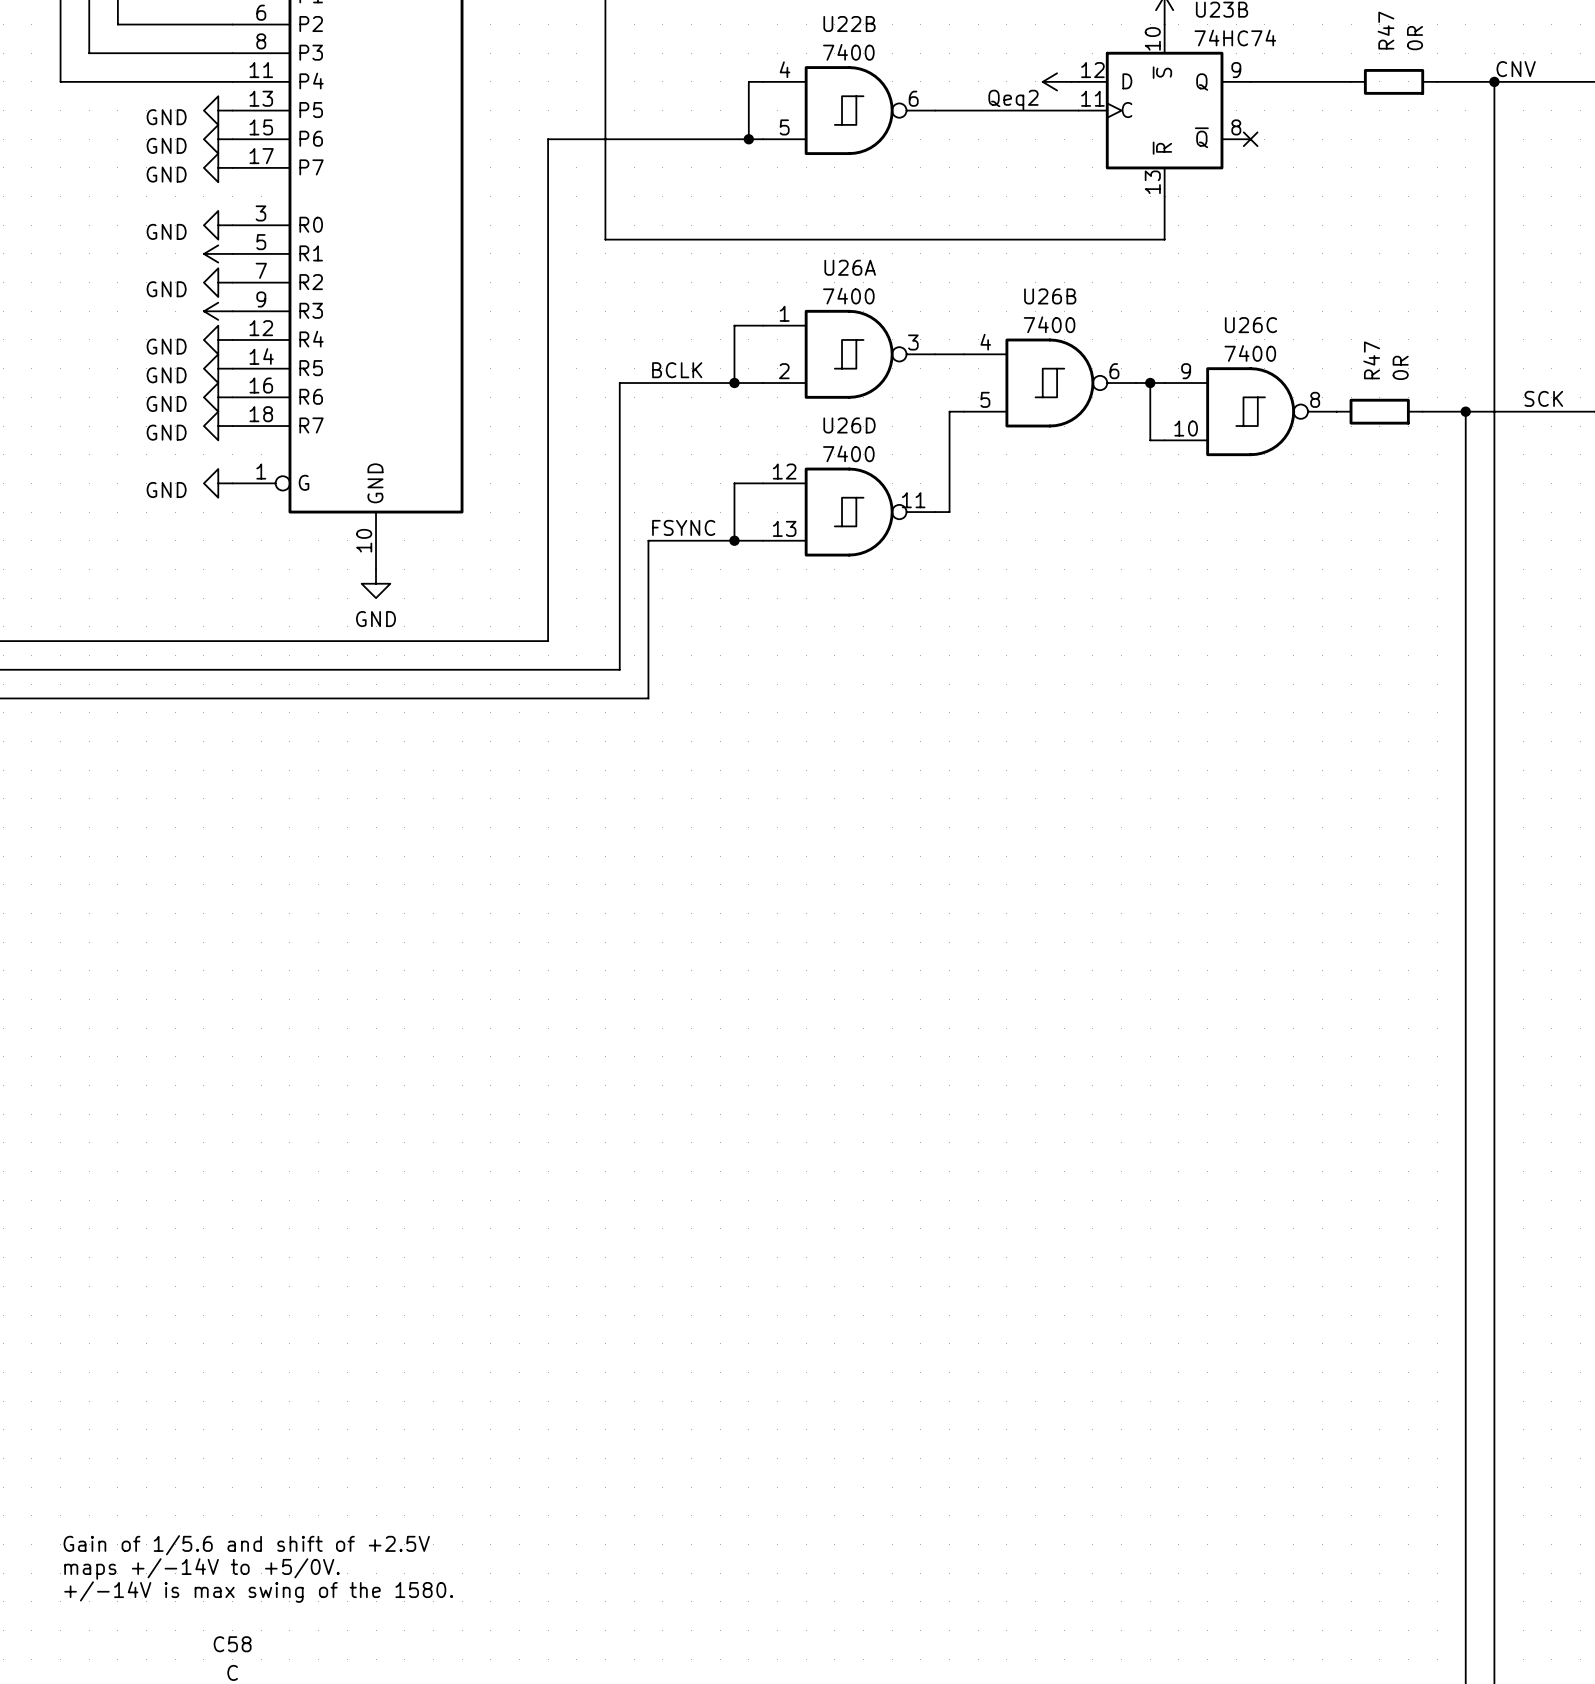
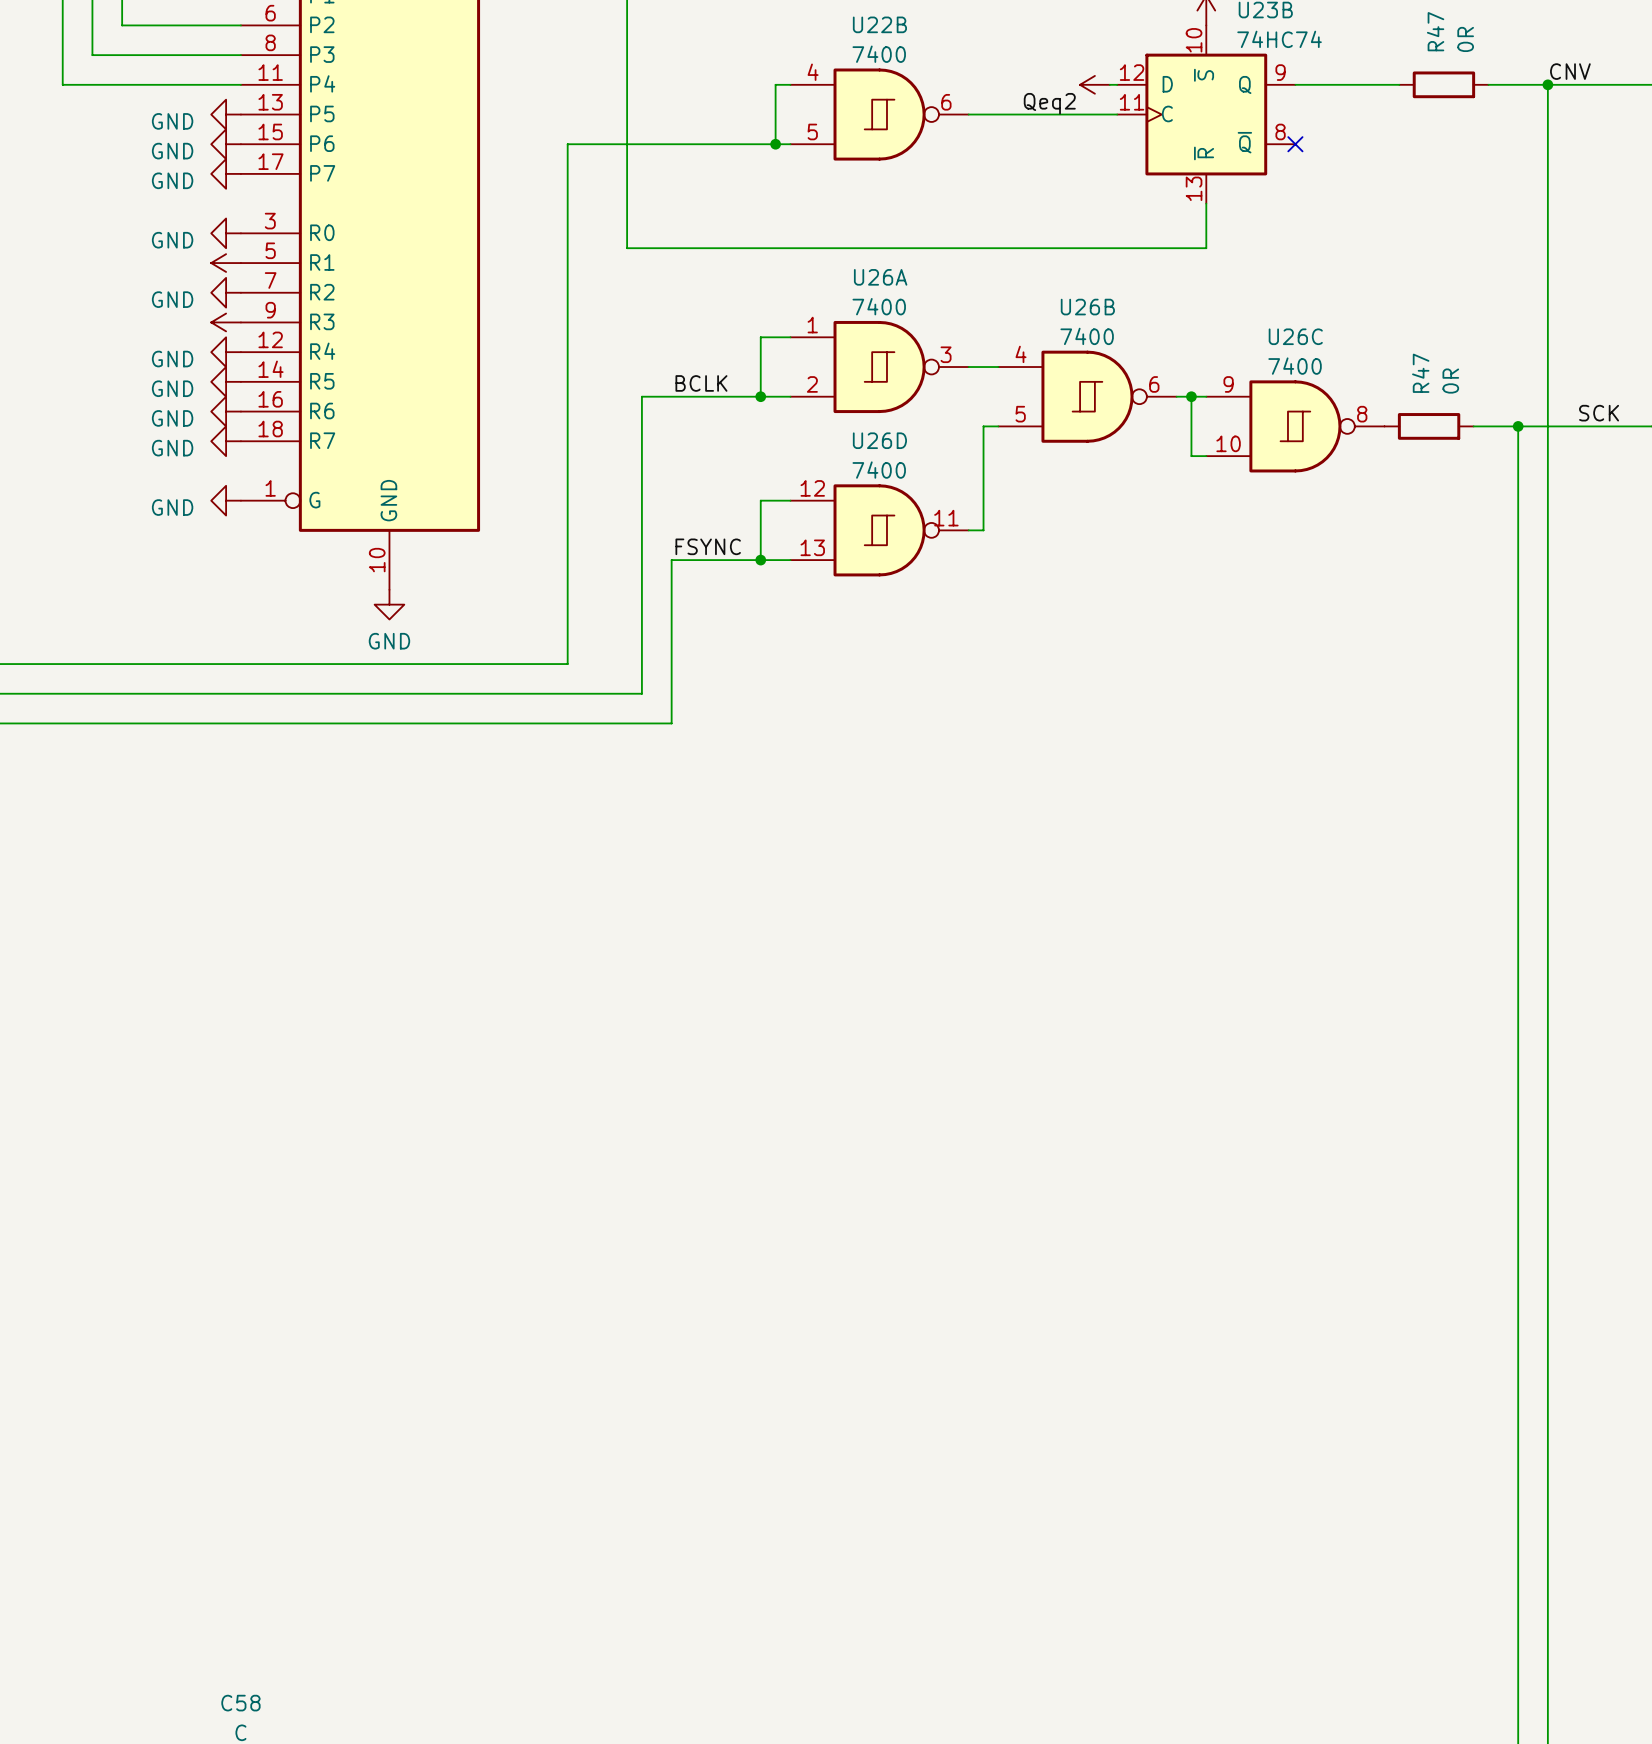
text: Gain of 1/5.6 and shift of +2.5V (246, 1545) -> none
text: maps +/-14V to +5/0V. (202, 1568) -> none
text: +/-14V is max swing of the 1580. (258, 1592) -> none

